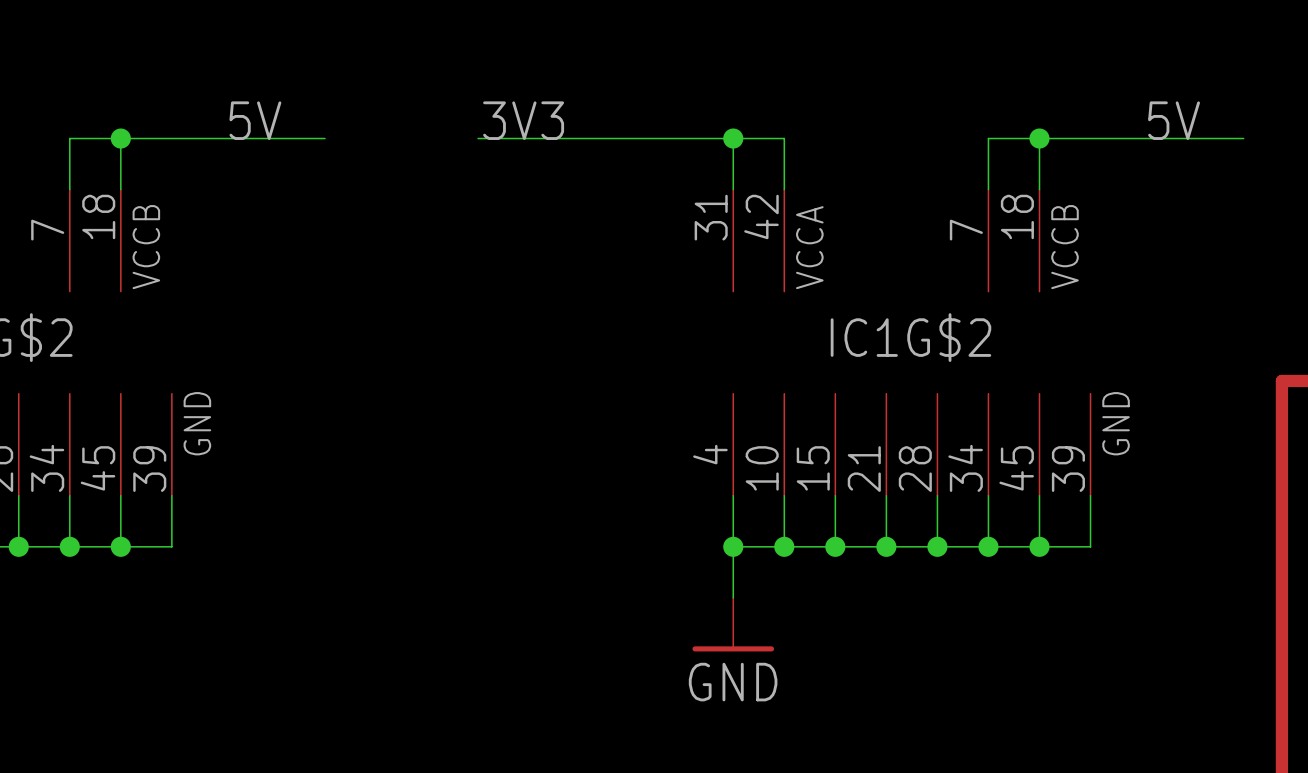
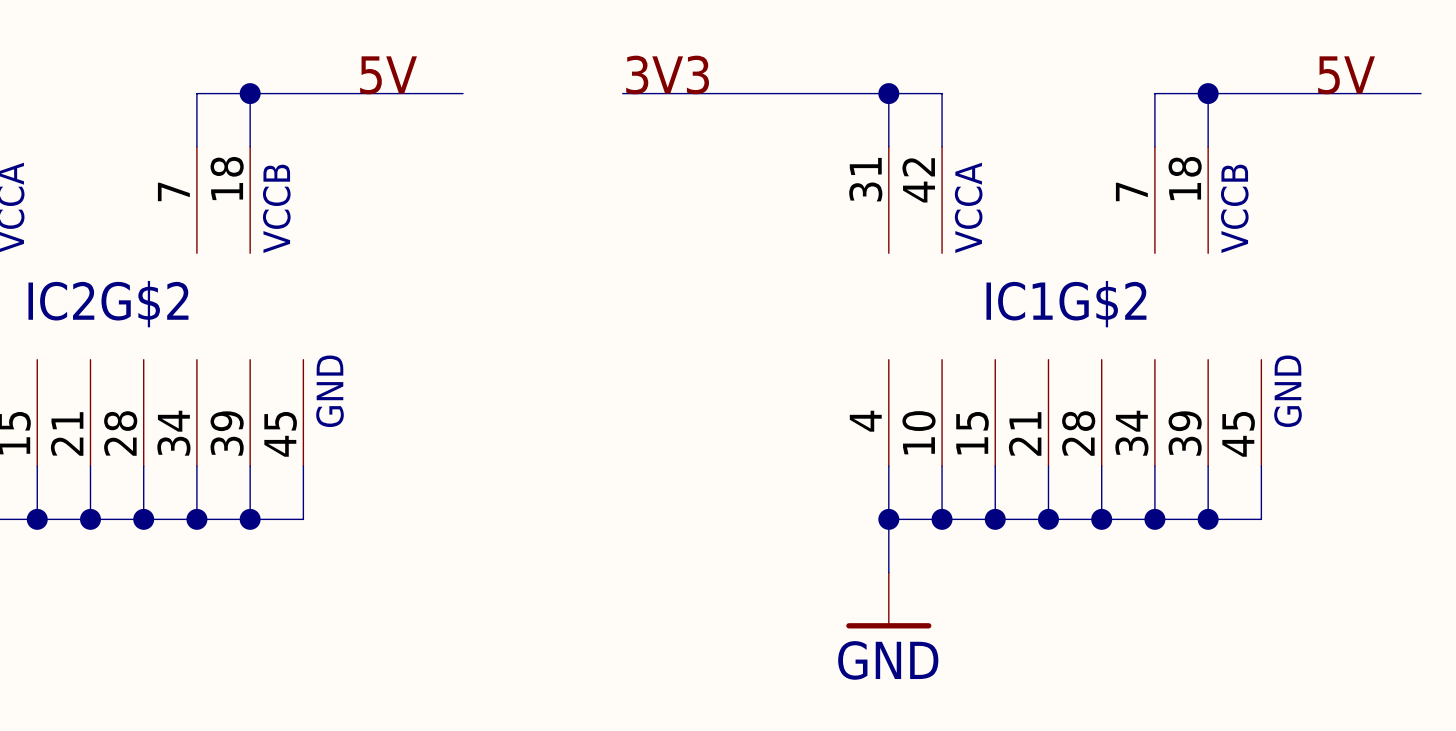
IC2G$2 pin number: 45 (97, 468) -> 39 (227, 433)
IC1G$2 pin number: 45 (1016, 468) -> 39 (1185, 433)
IC2G$2 pin number: 39 (149, 469) -> 45 (280, 434)
IC1G$2 pin number: 39 (1068, 469) -> 45 (1238, 434)

